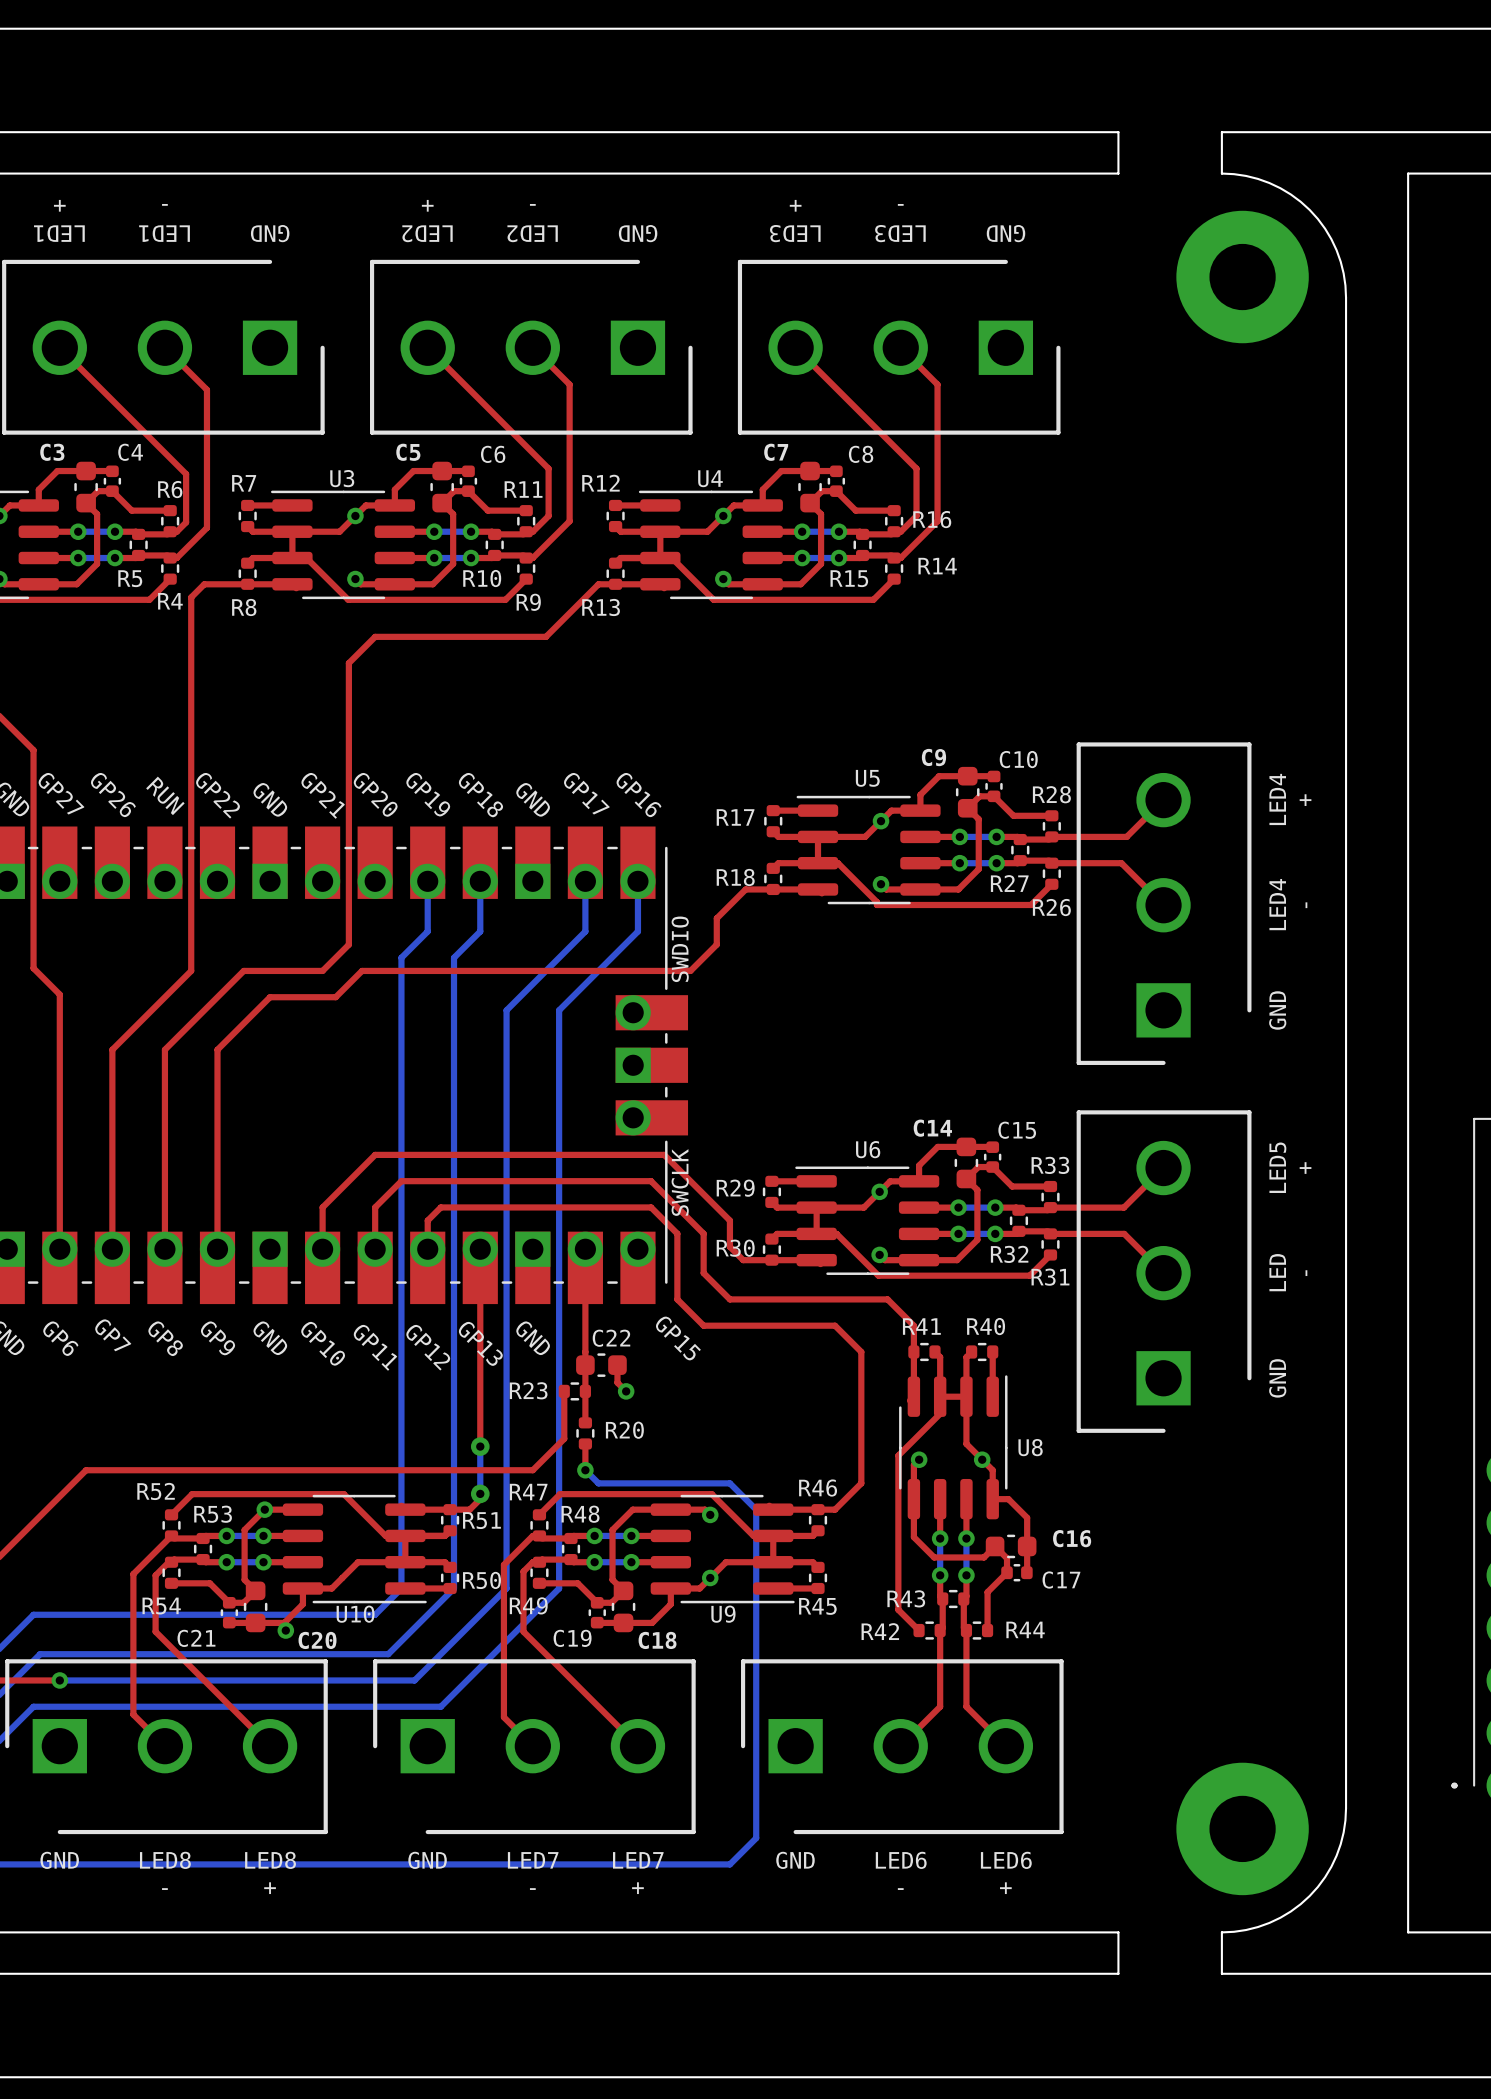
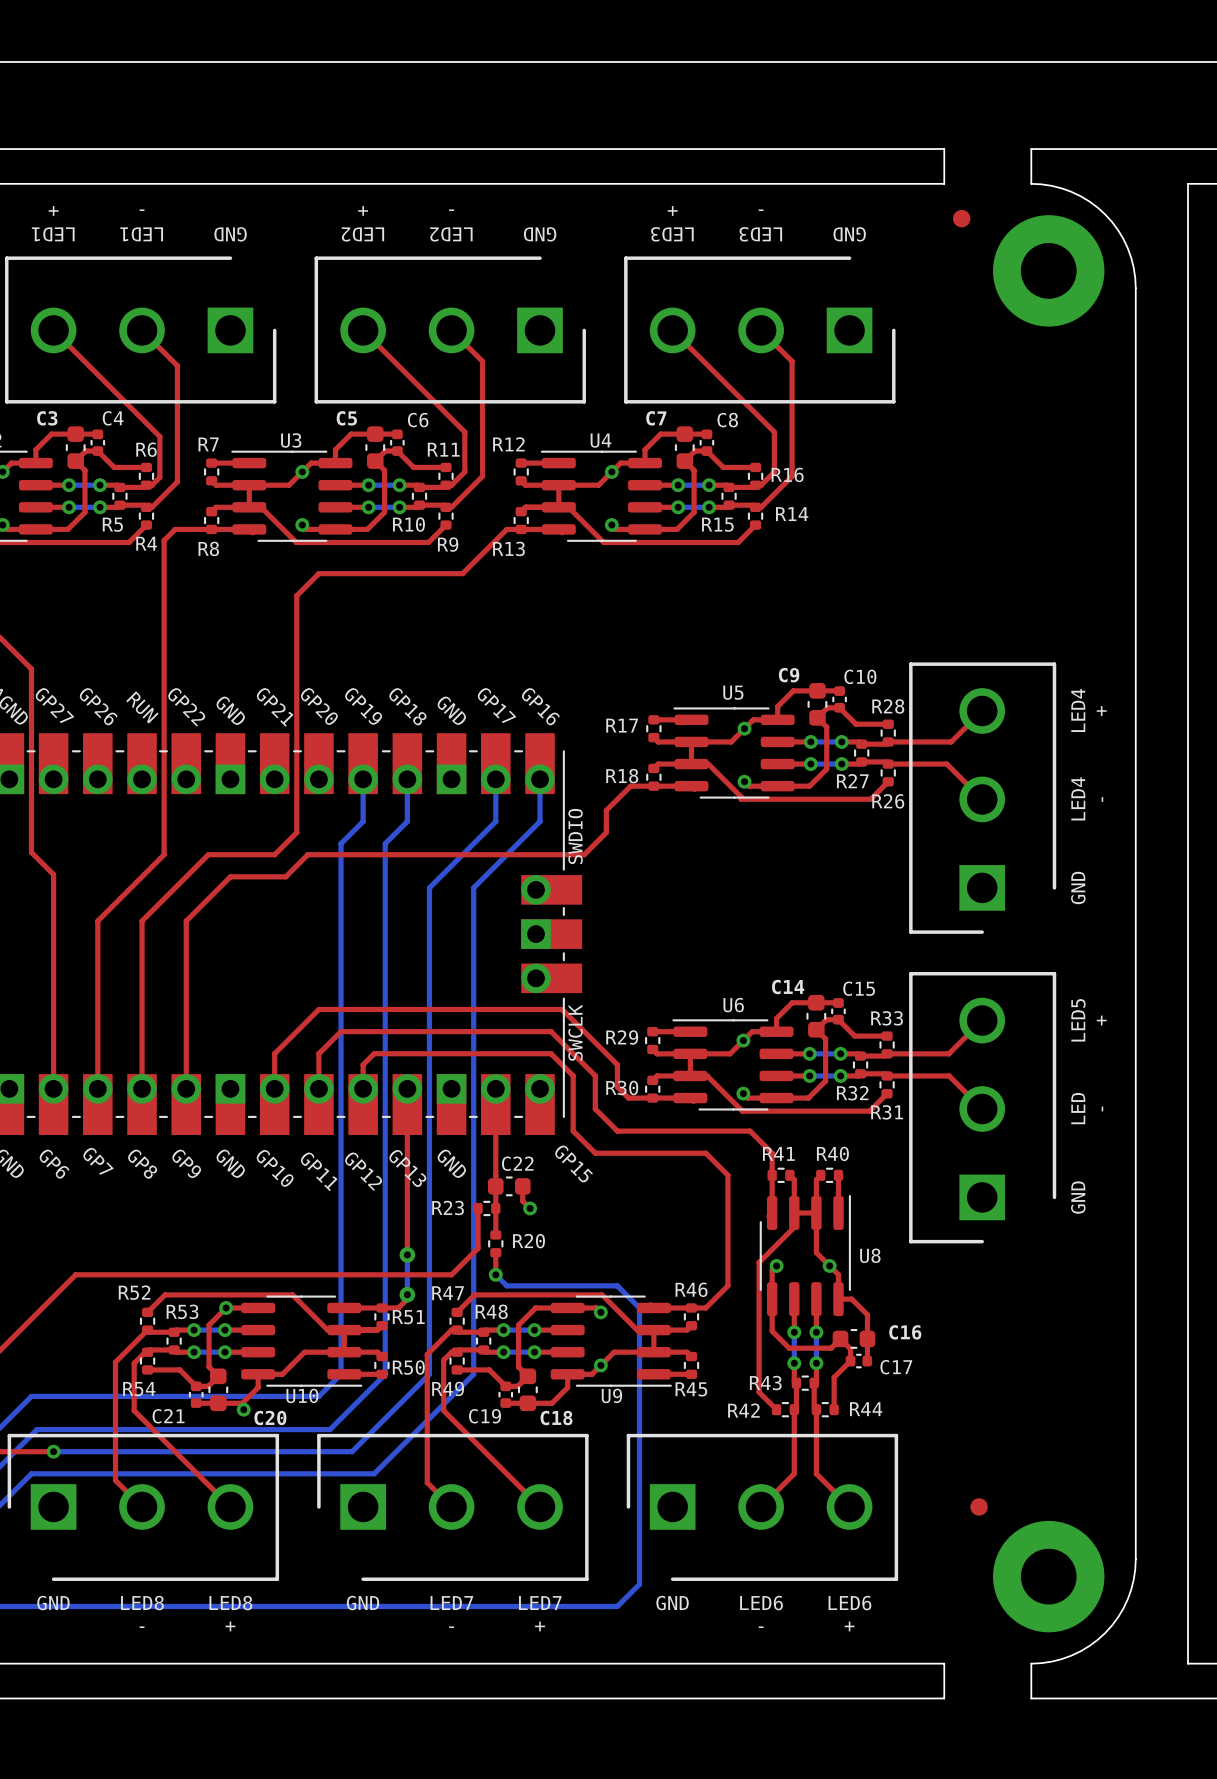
part: none -> (961, 218)
part: none -> (979, 1506)

